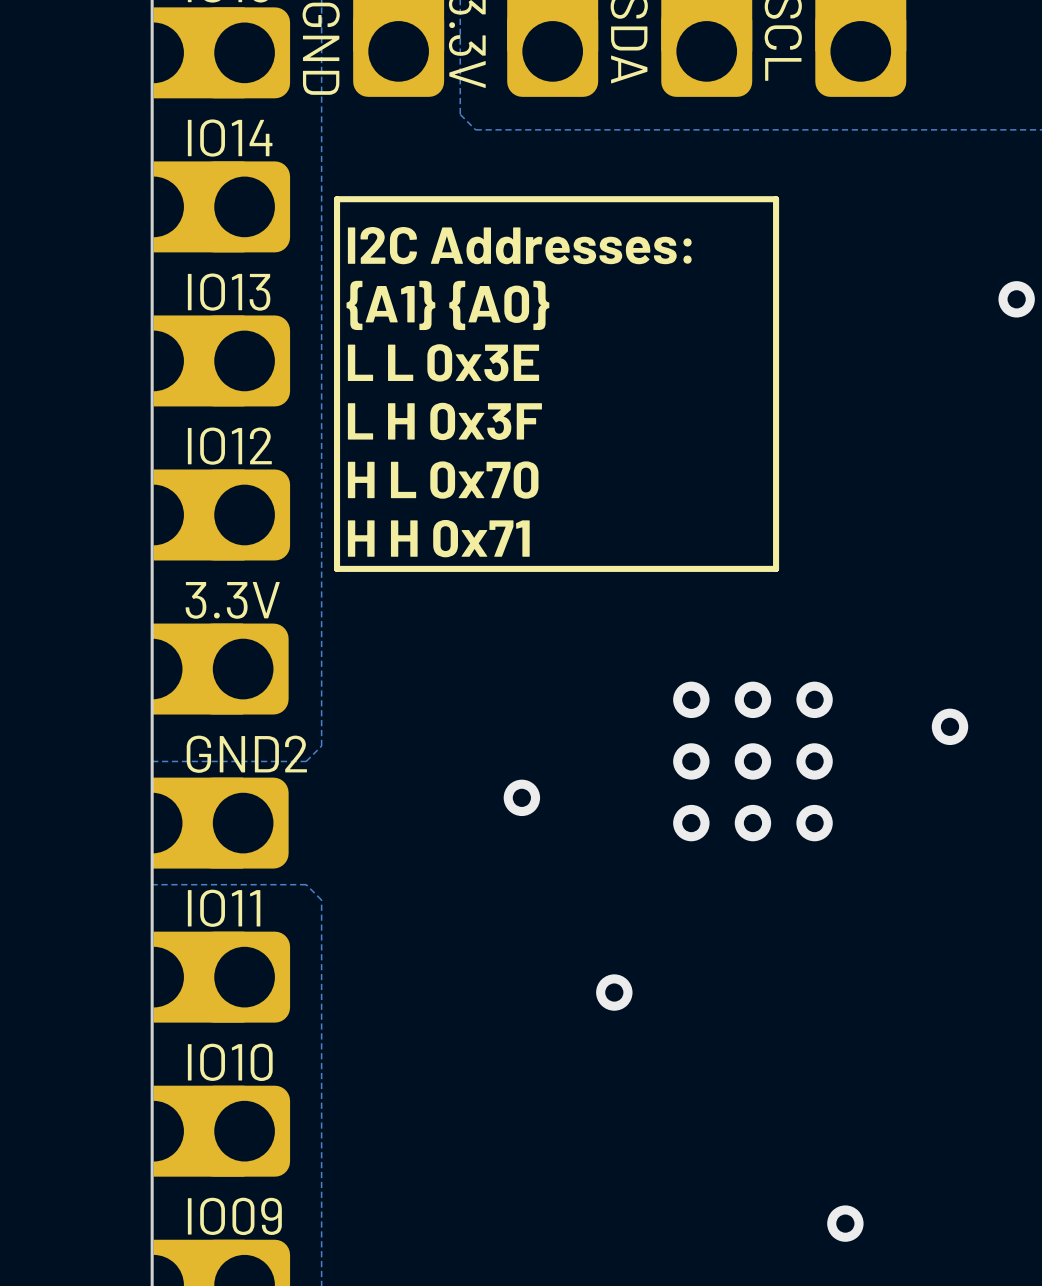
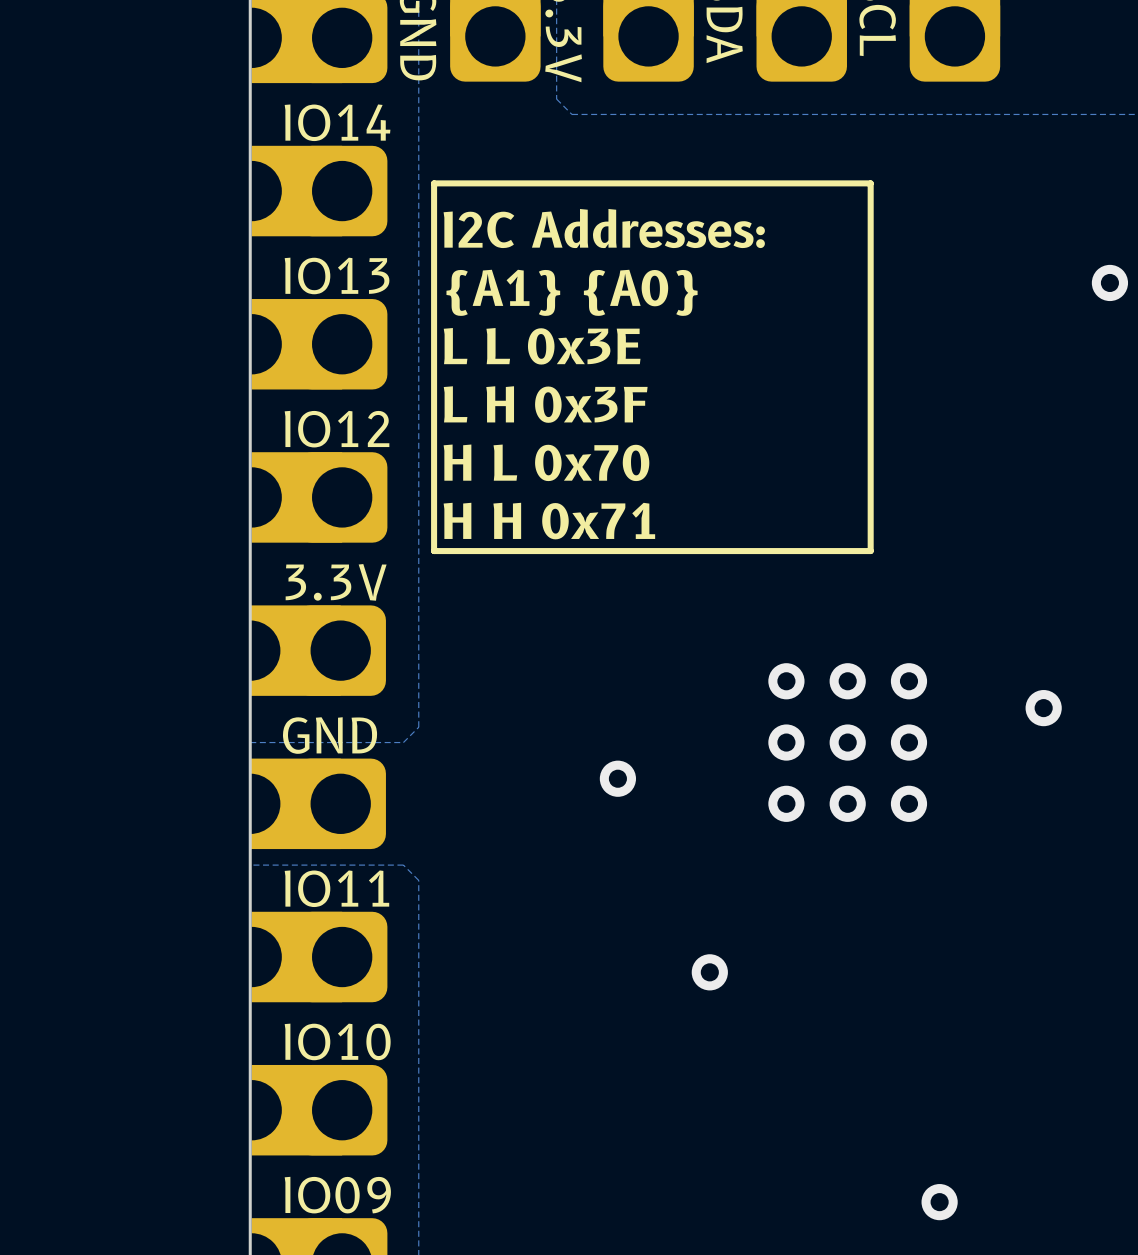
text: GND2 (246, 754) -> GND (330, 735)

